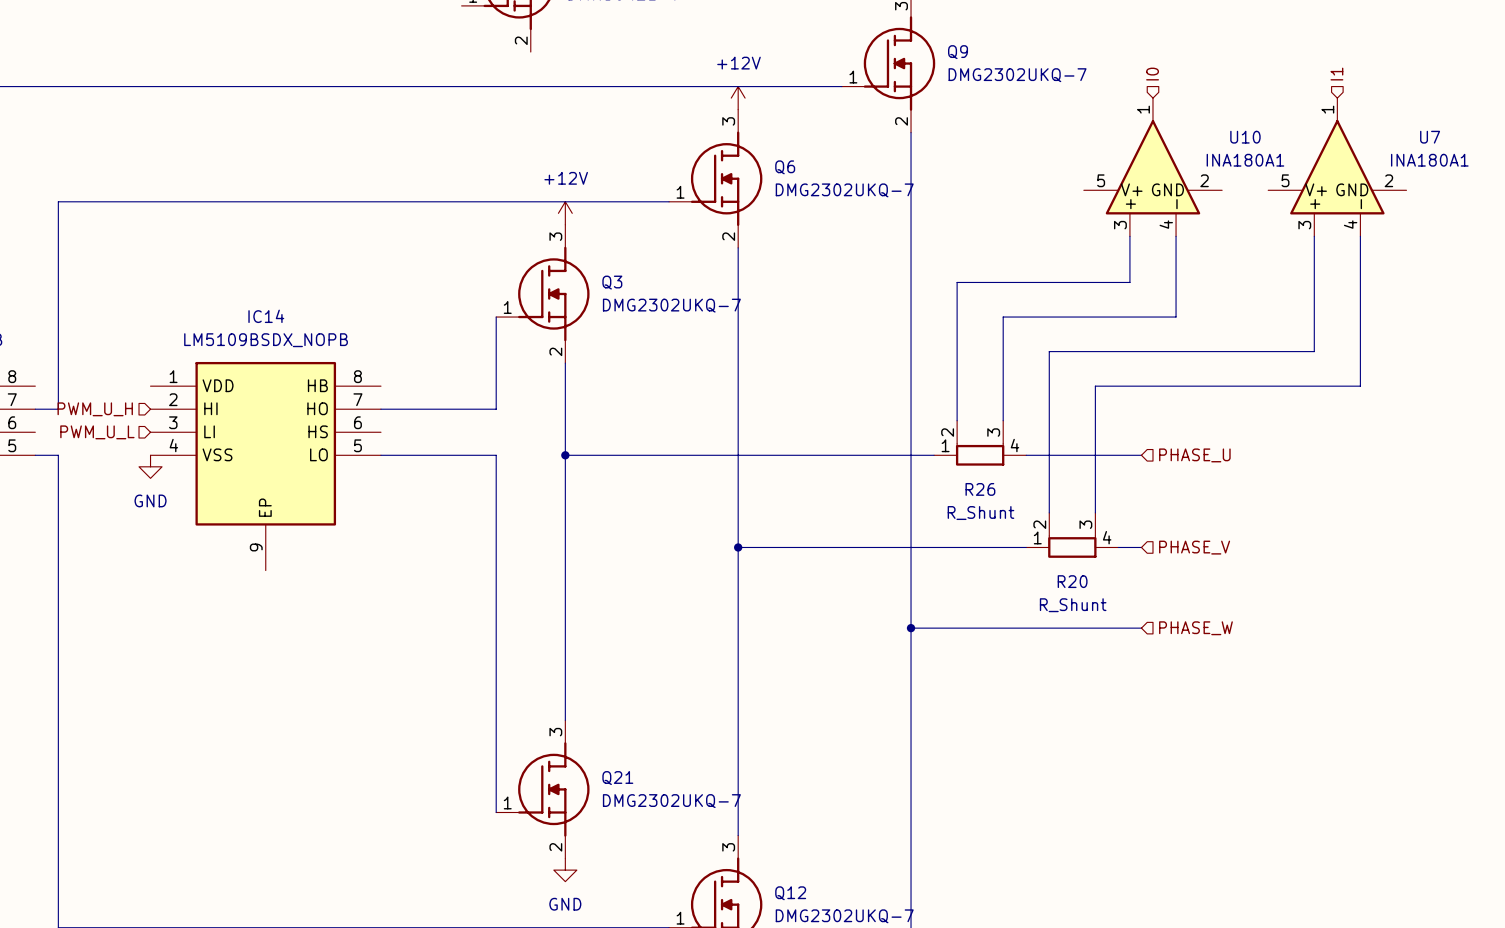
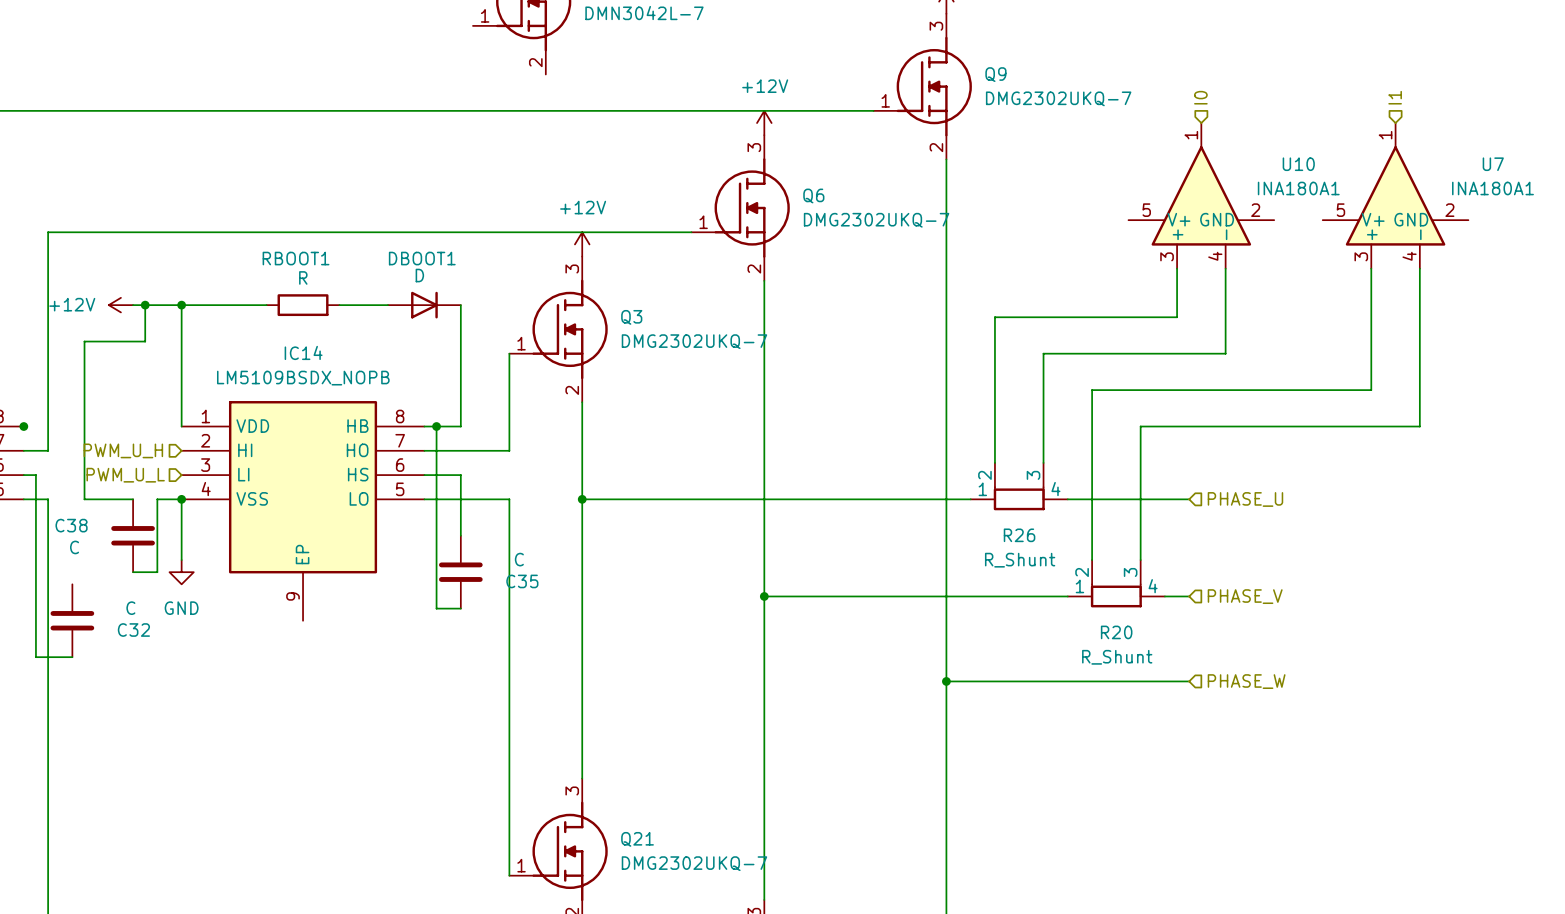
power symbol: none -> +12V (120, 305)
wire: none -> (133, 305) (266, 305)
wire: none -> (145, 305) (145, 341) (84, 341) (84, 499) (133, 499)
junction: none -> (145, 305)
wire: none -> (181, 305) (181, 426)
junction: none -> (181, 305)
RBOOT1: none -> R (303, 305)
wire: none -> (339, 305) (388, 305)
DBOOT1: none -> D (424, 305)
wire: none -> (460, 305) (460, 426) (424, 426)
junction: none -> (23, 426)
wire: none -> (436, 426) (436, 608) (460, 608)
junction: none -> (436, 426)
hierarchical label position: PWM_U_H (95, 409) -> PWM_U_H (123, 450)
wire: none -> (23, 475) (35, 475) (35, 657) (72, 657)
hierarchical label position: PWM_U_L (97, 432) -> PWM_U_L (125, 475)
wire: none -> (424, 475) (460, 475) (460, 535)
junction: none -> (181, 499)
power symbol position: GND (150, 466) -> GND (181, 572)
IC14 position: (265, 466) -> (303, 510)
C38: none -> C (133, 535)
wire: none -> (181, 560) (181, 499) (157, 499) (157, 572) (133, 572)
C35: none -> C (460, 572)
C32: none -> C (72, 620)

